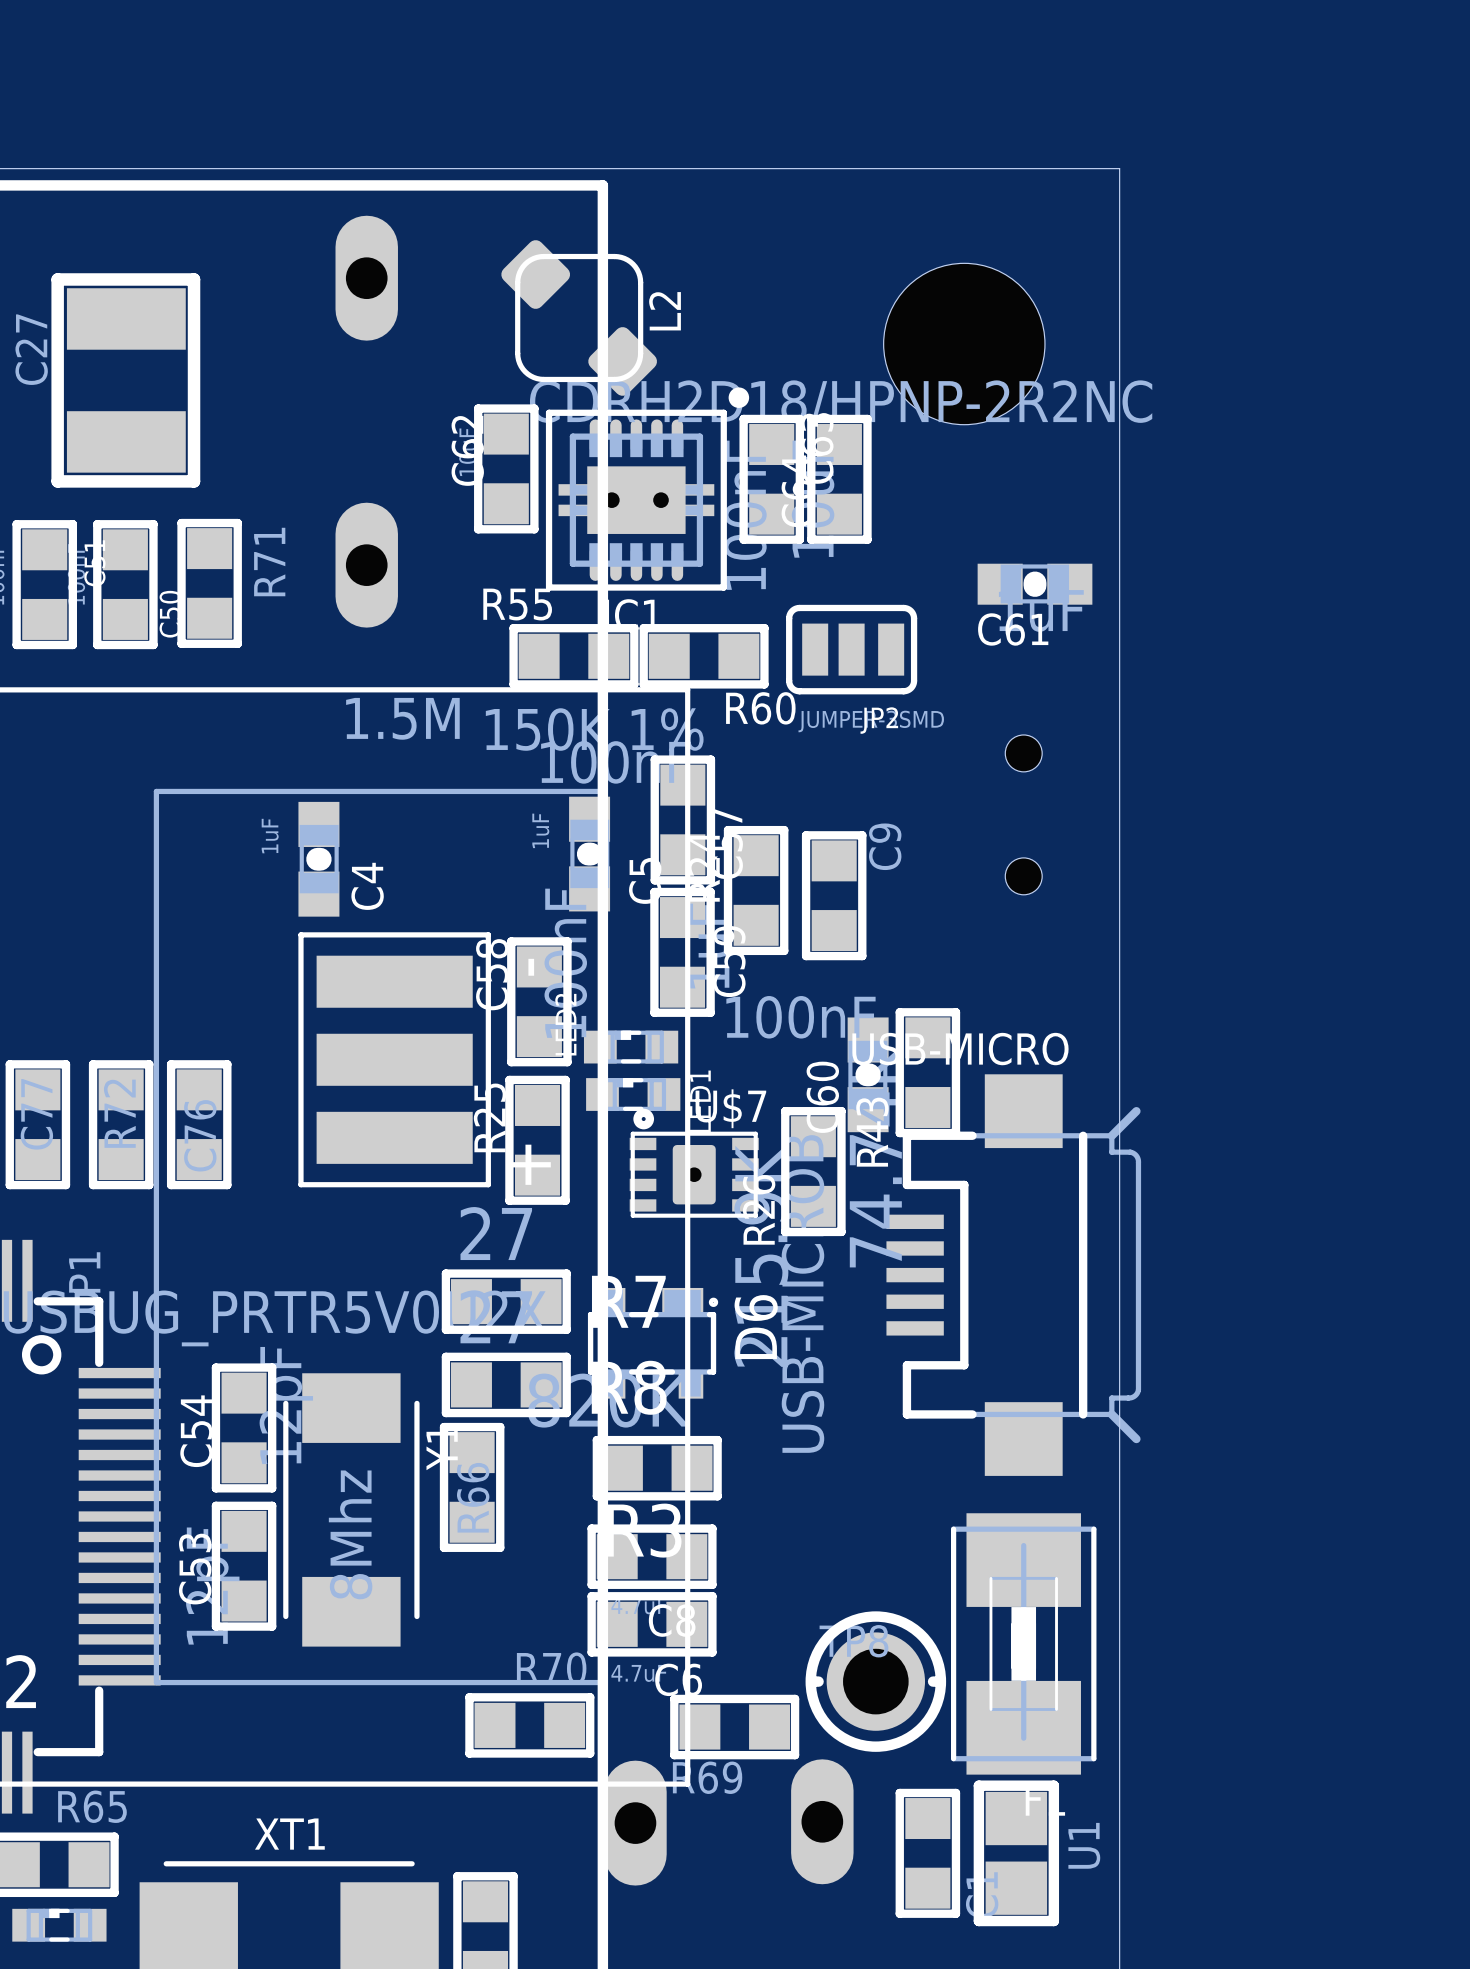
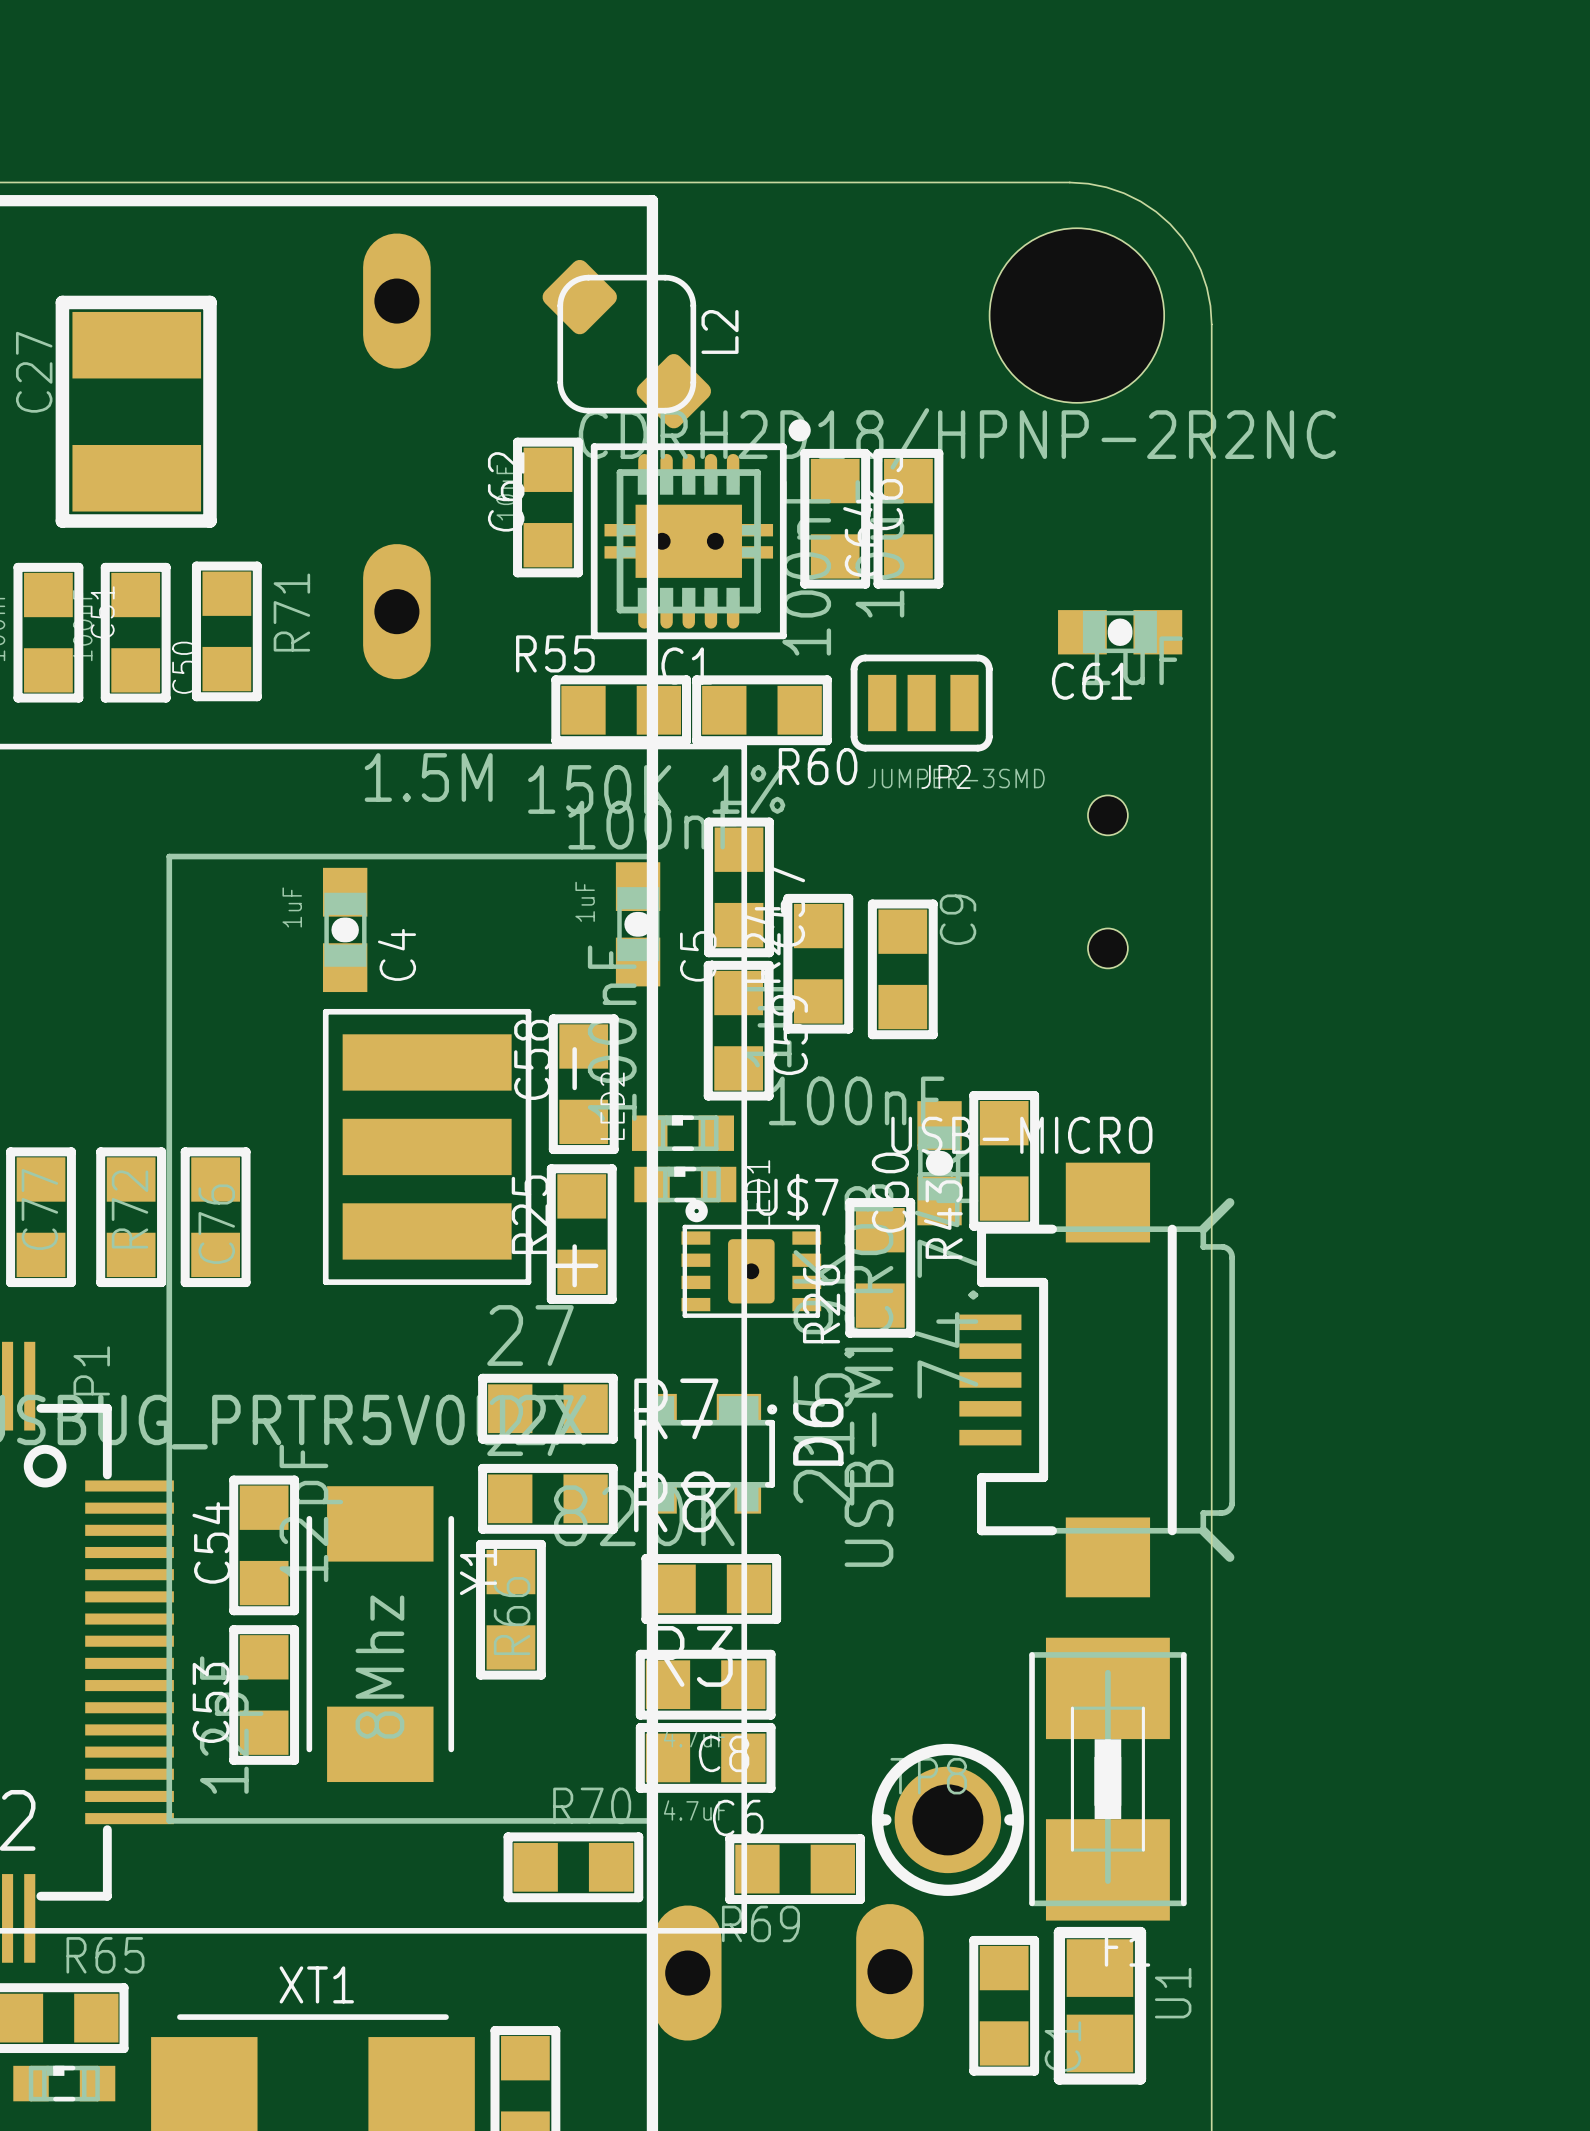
board edge: (988, 168) (1119, 168) (1119, 299) -> (1069, 182) (1106, 187) (1124, 193) (1156, 211) (1170, 224) (1182, 238) (1200, 270) (1206, 287) (1211, 324)
hole position: (964, 344) -> (1076, 315)

